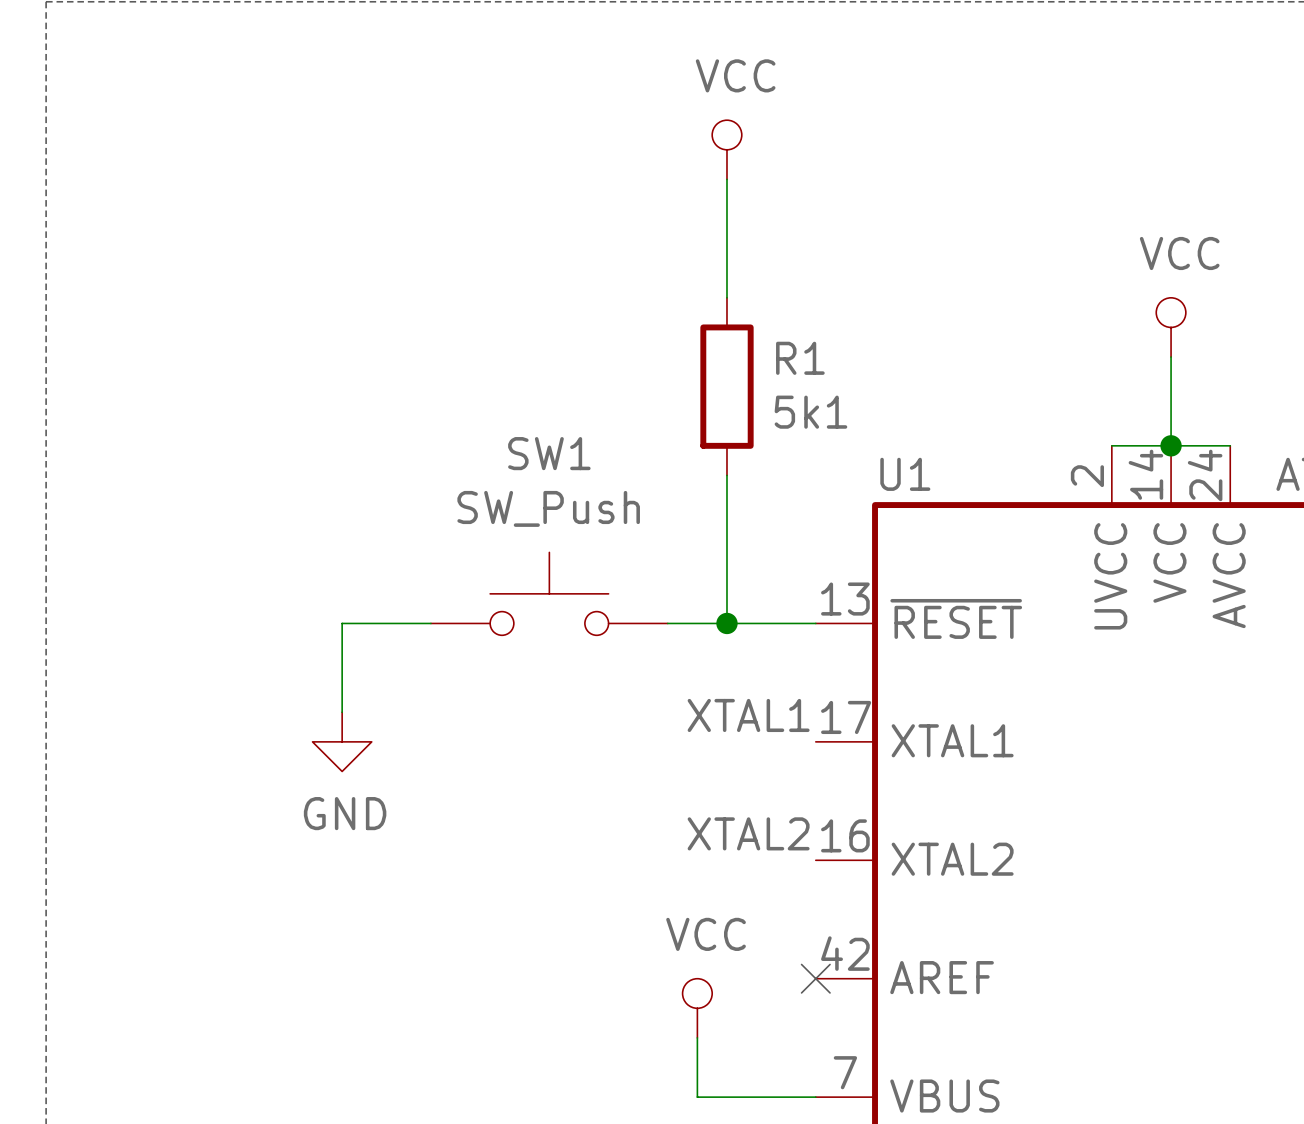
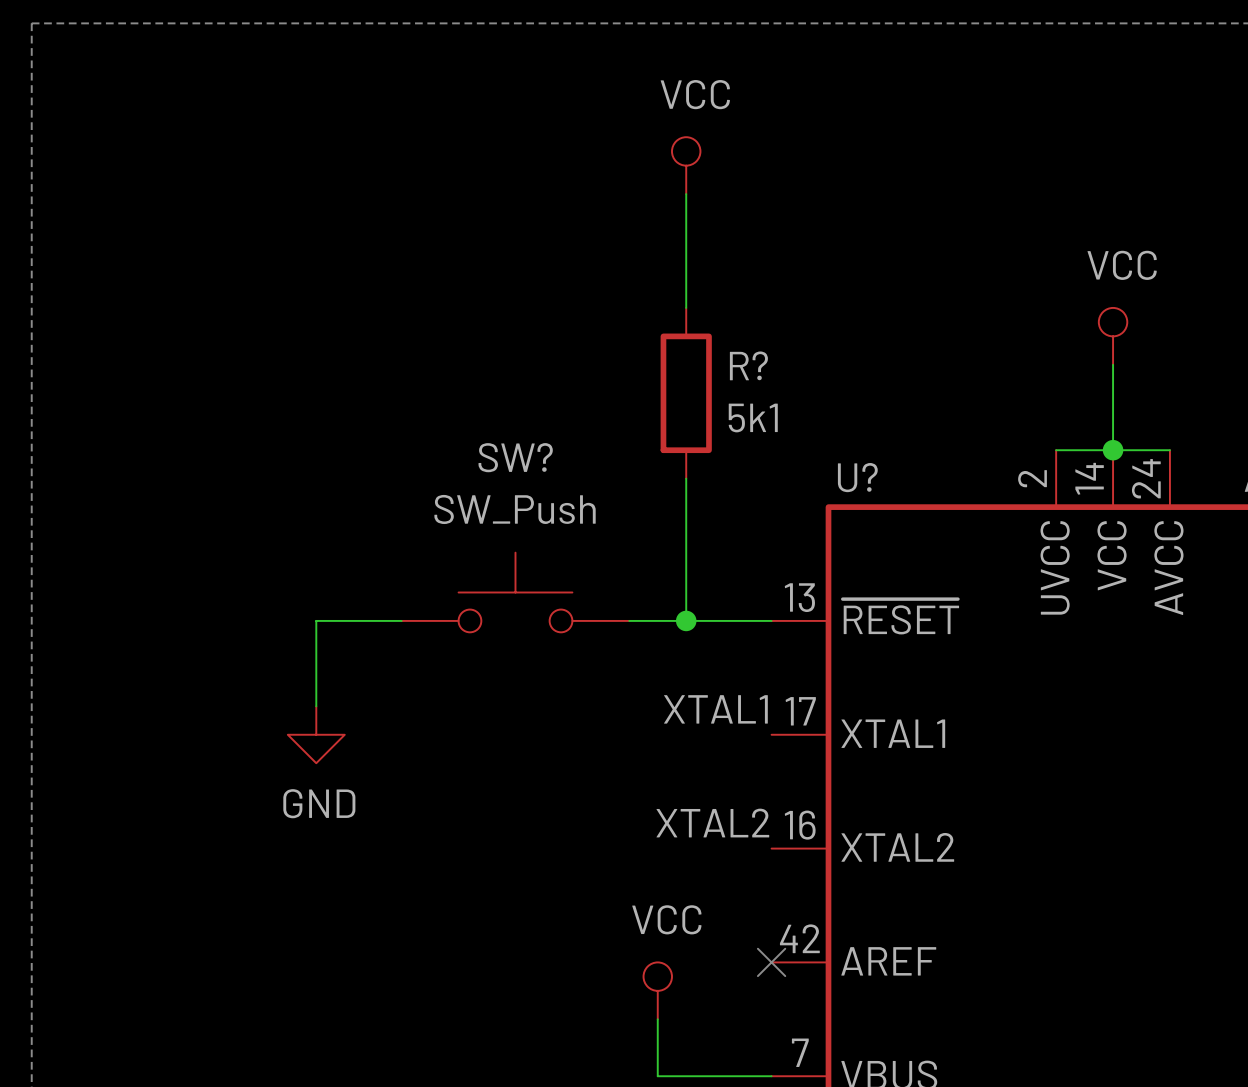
R1 name: R1 (800, 358) -> R? (748, 365)
SW1 name: SW1 (549, 453) -> SW? (515, 457)
U1 name: U1 (905, 474) -> U? (857, 477)

